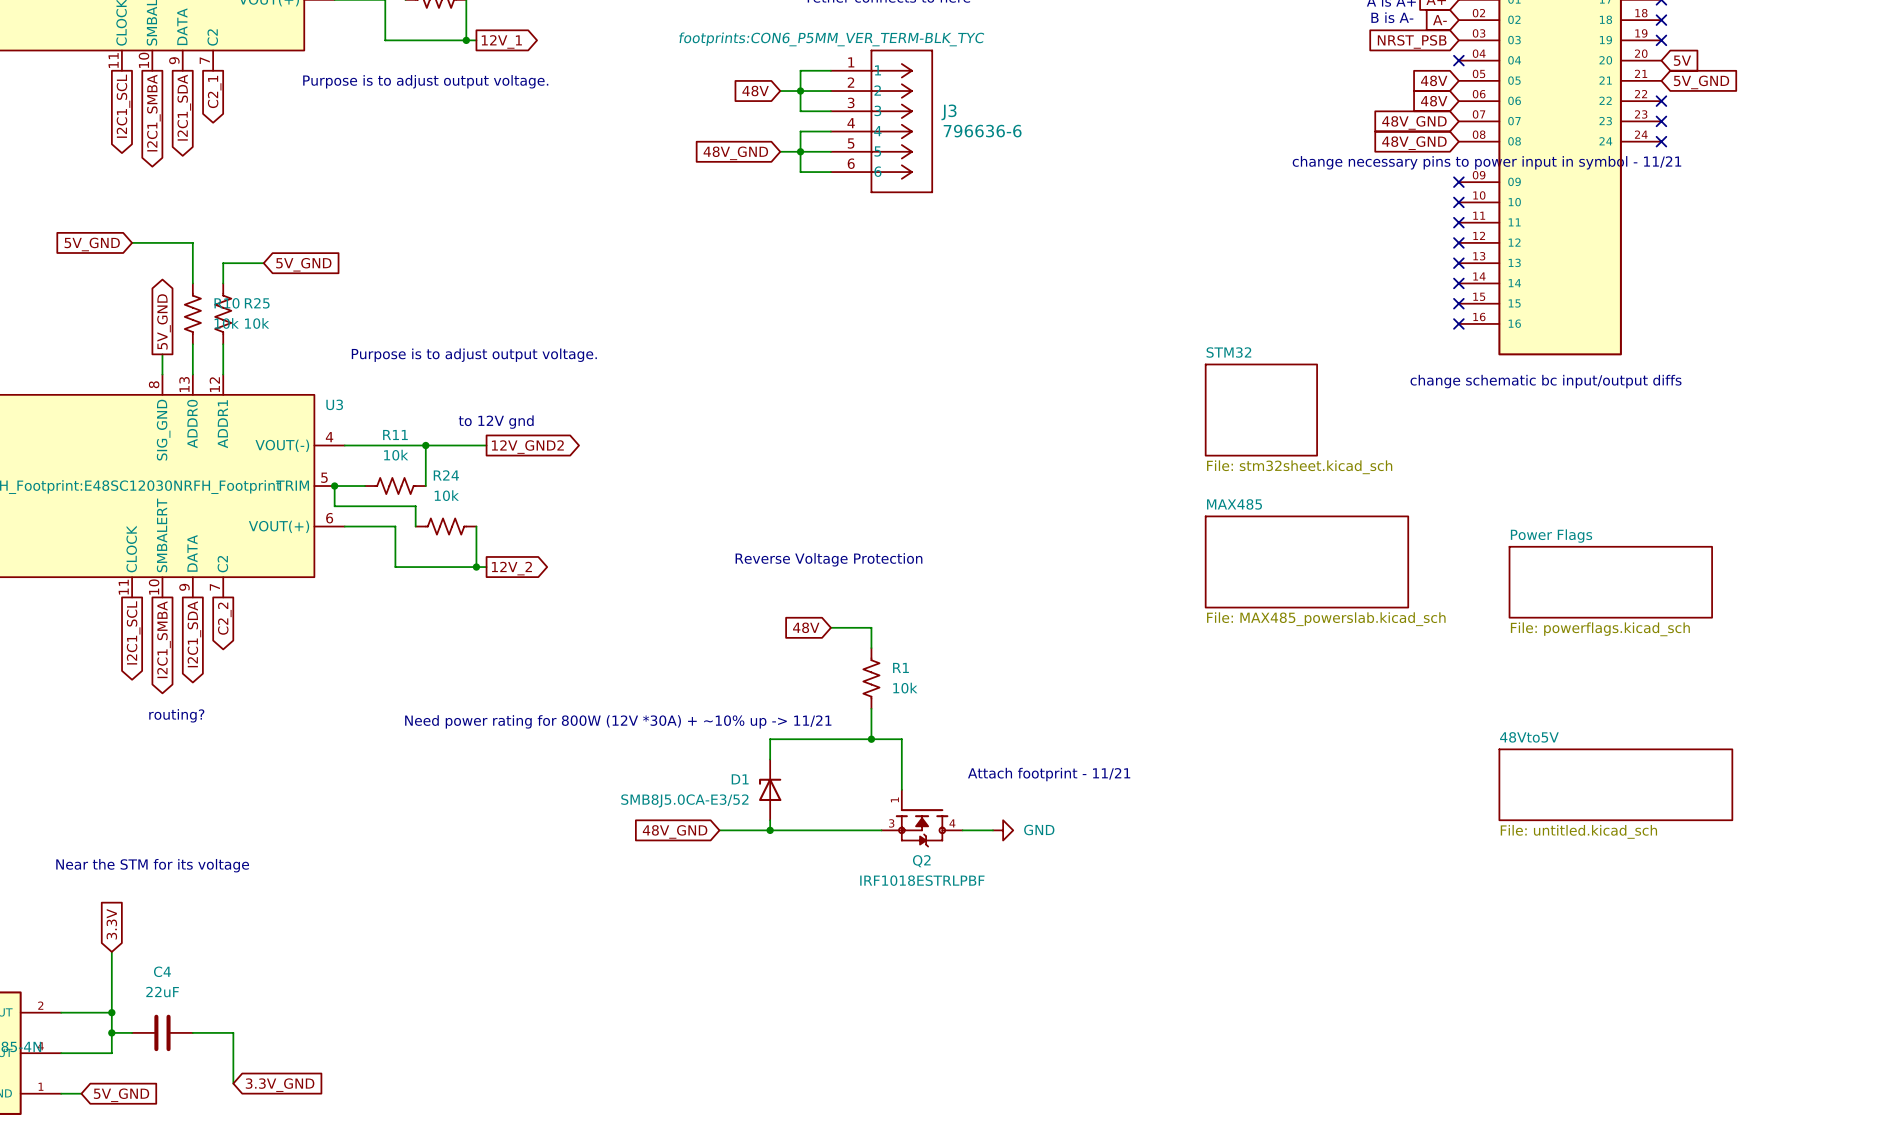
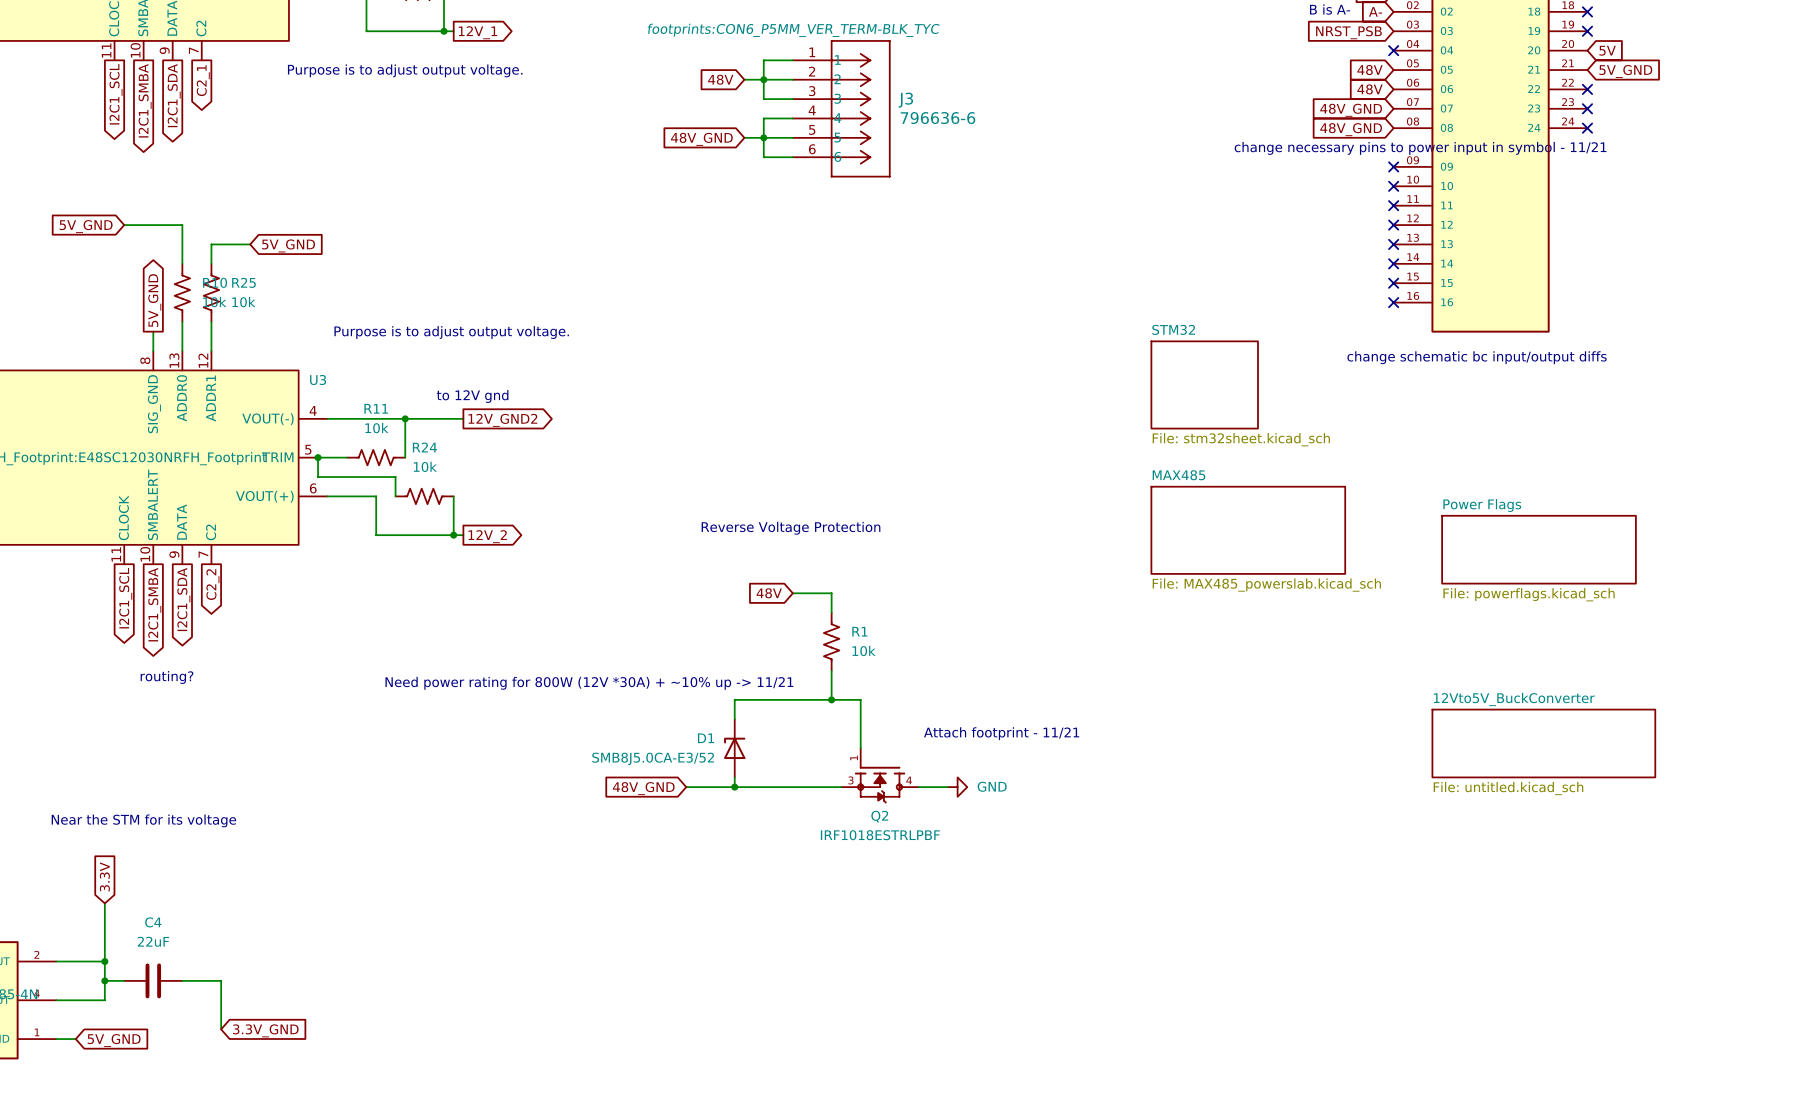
sheet 48Vto5V name: 48Vto5V (1529, 737) -> 12Vto5V_BuckConverter (1514, 699)

